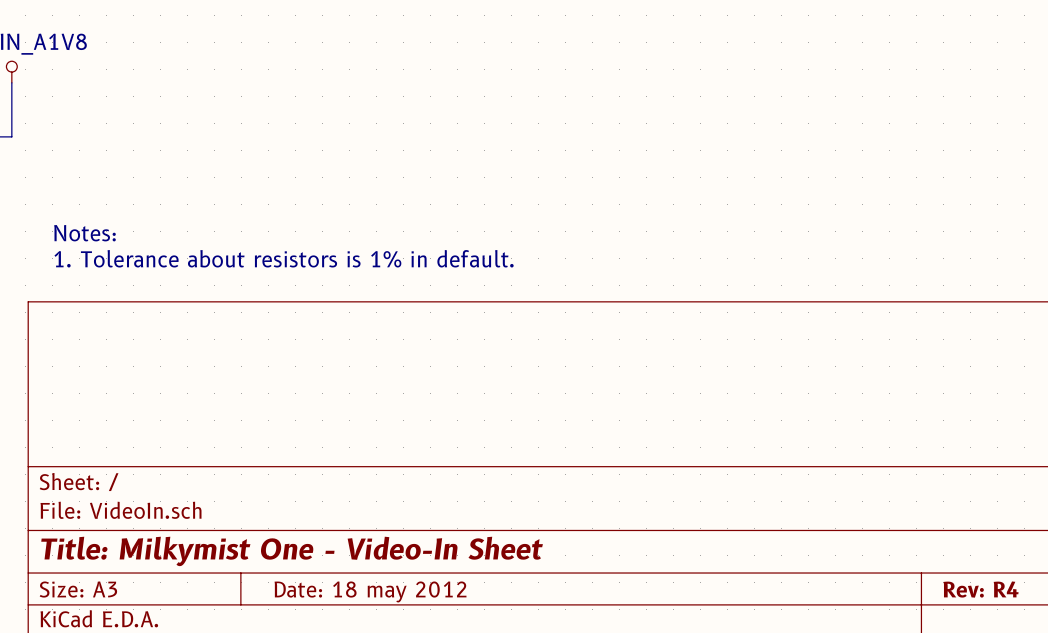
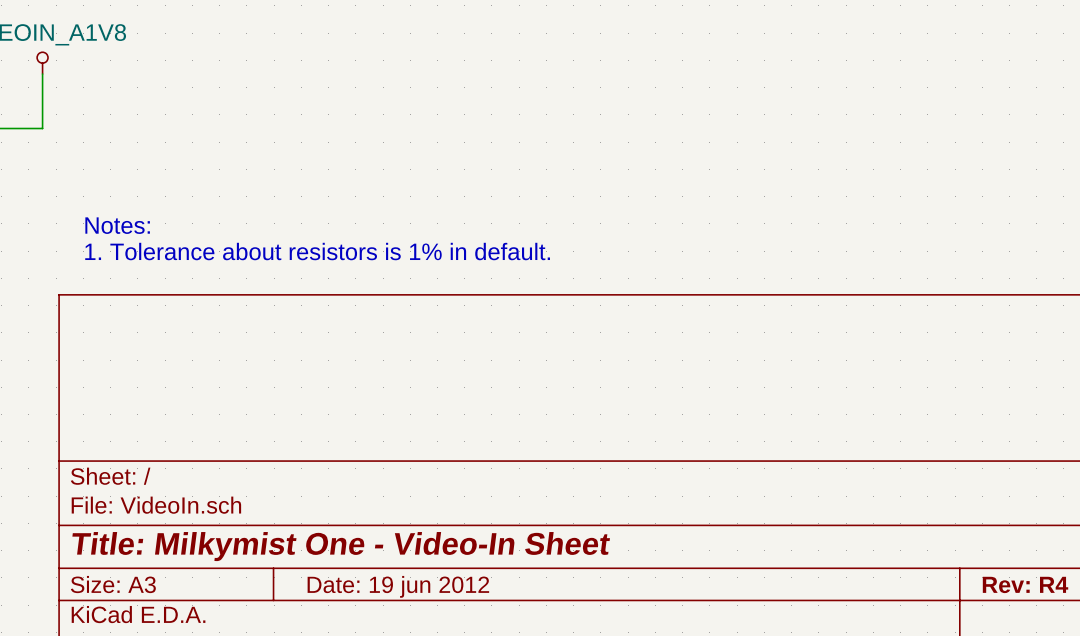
title block: Date: 18 may 2012 (370, 591) -> Date: 19 jun 2012 (398, 586)

